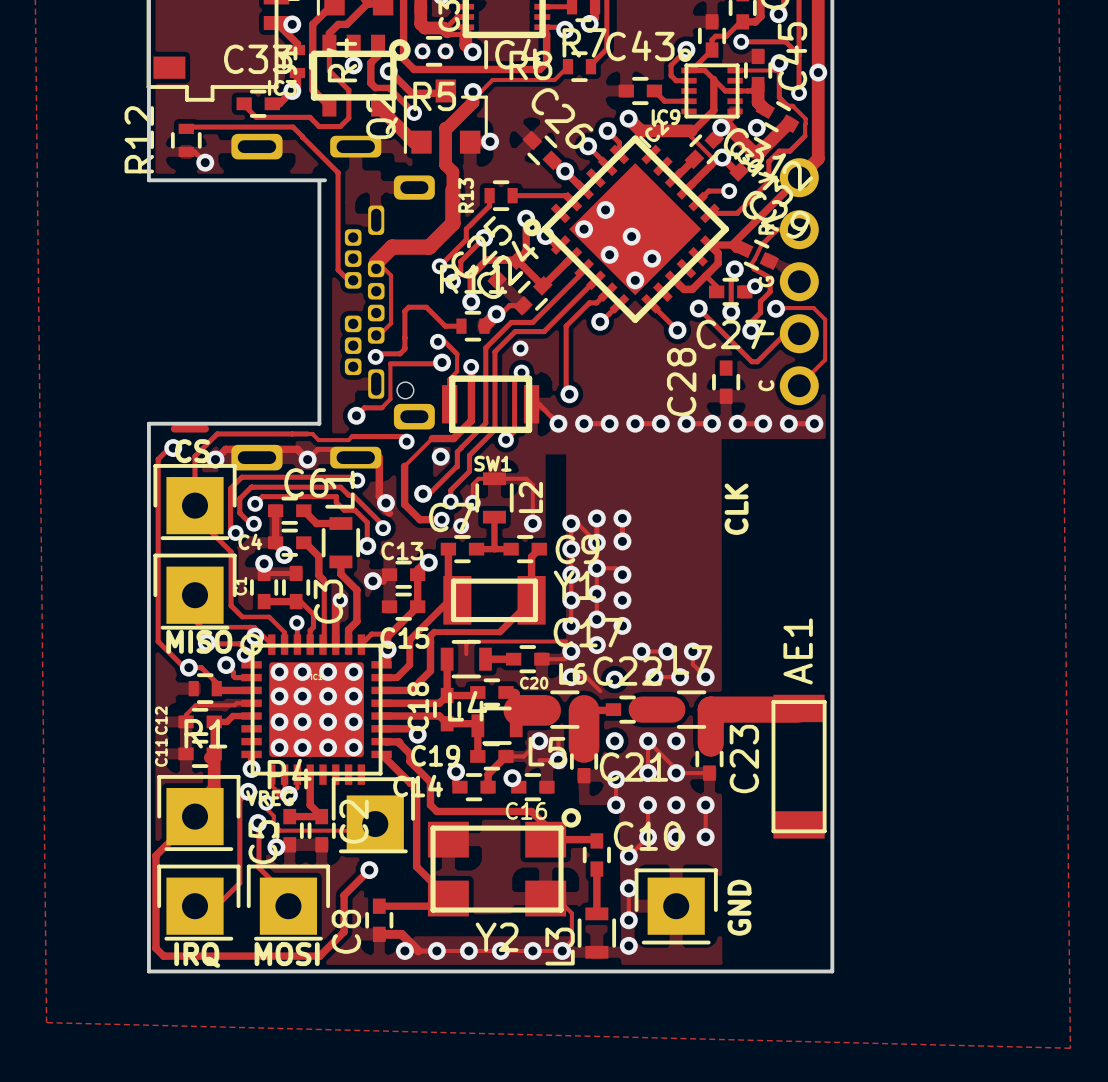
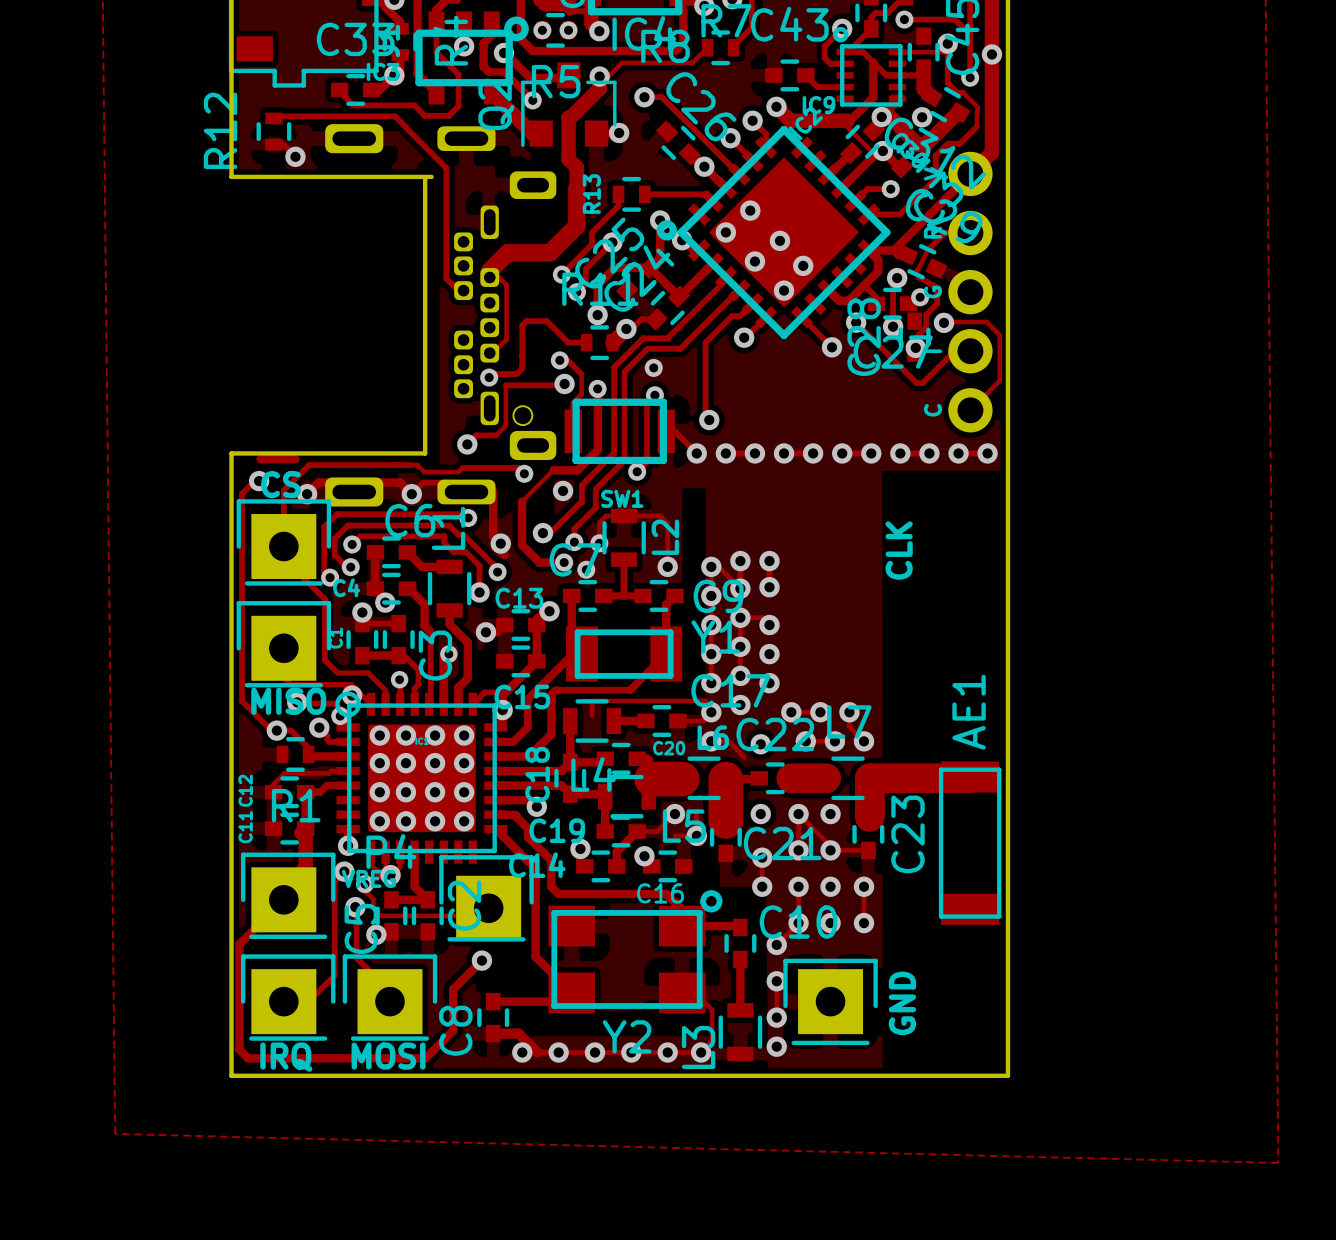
track: none -> (644, 97) (661, 97) (739, 174)
via: none -> (644, 97)
C28 position: (726, 382) -> (914, 337)

